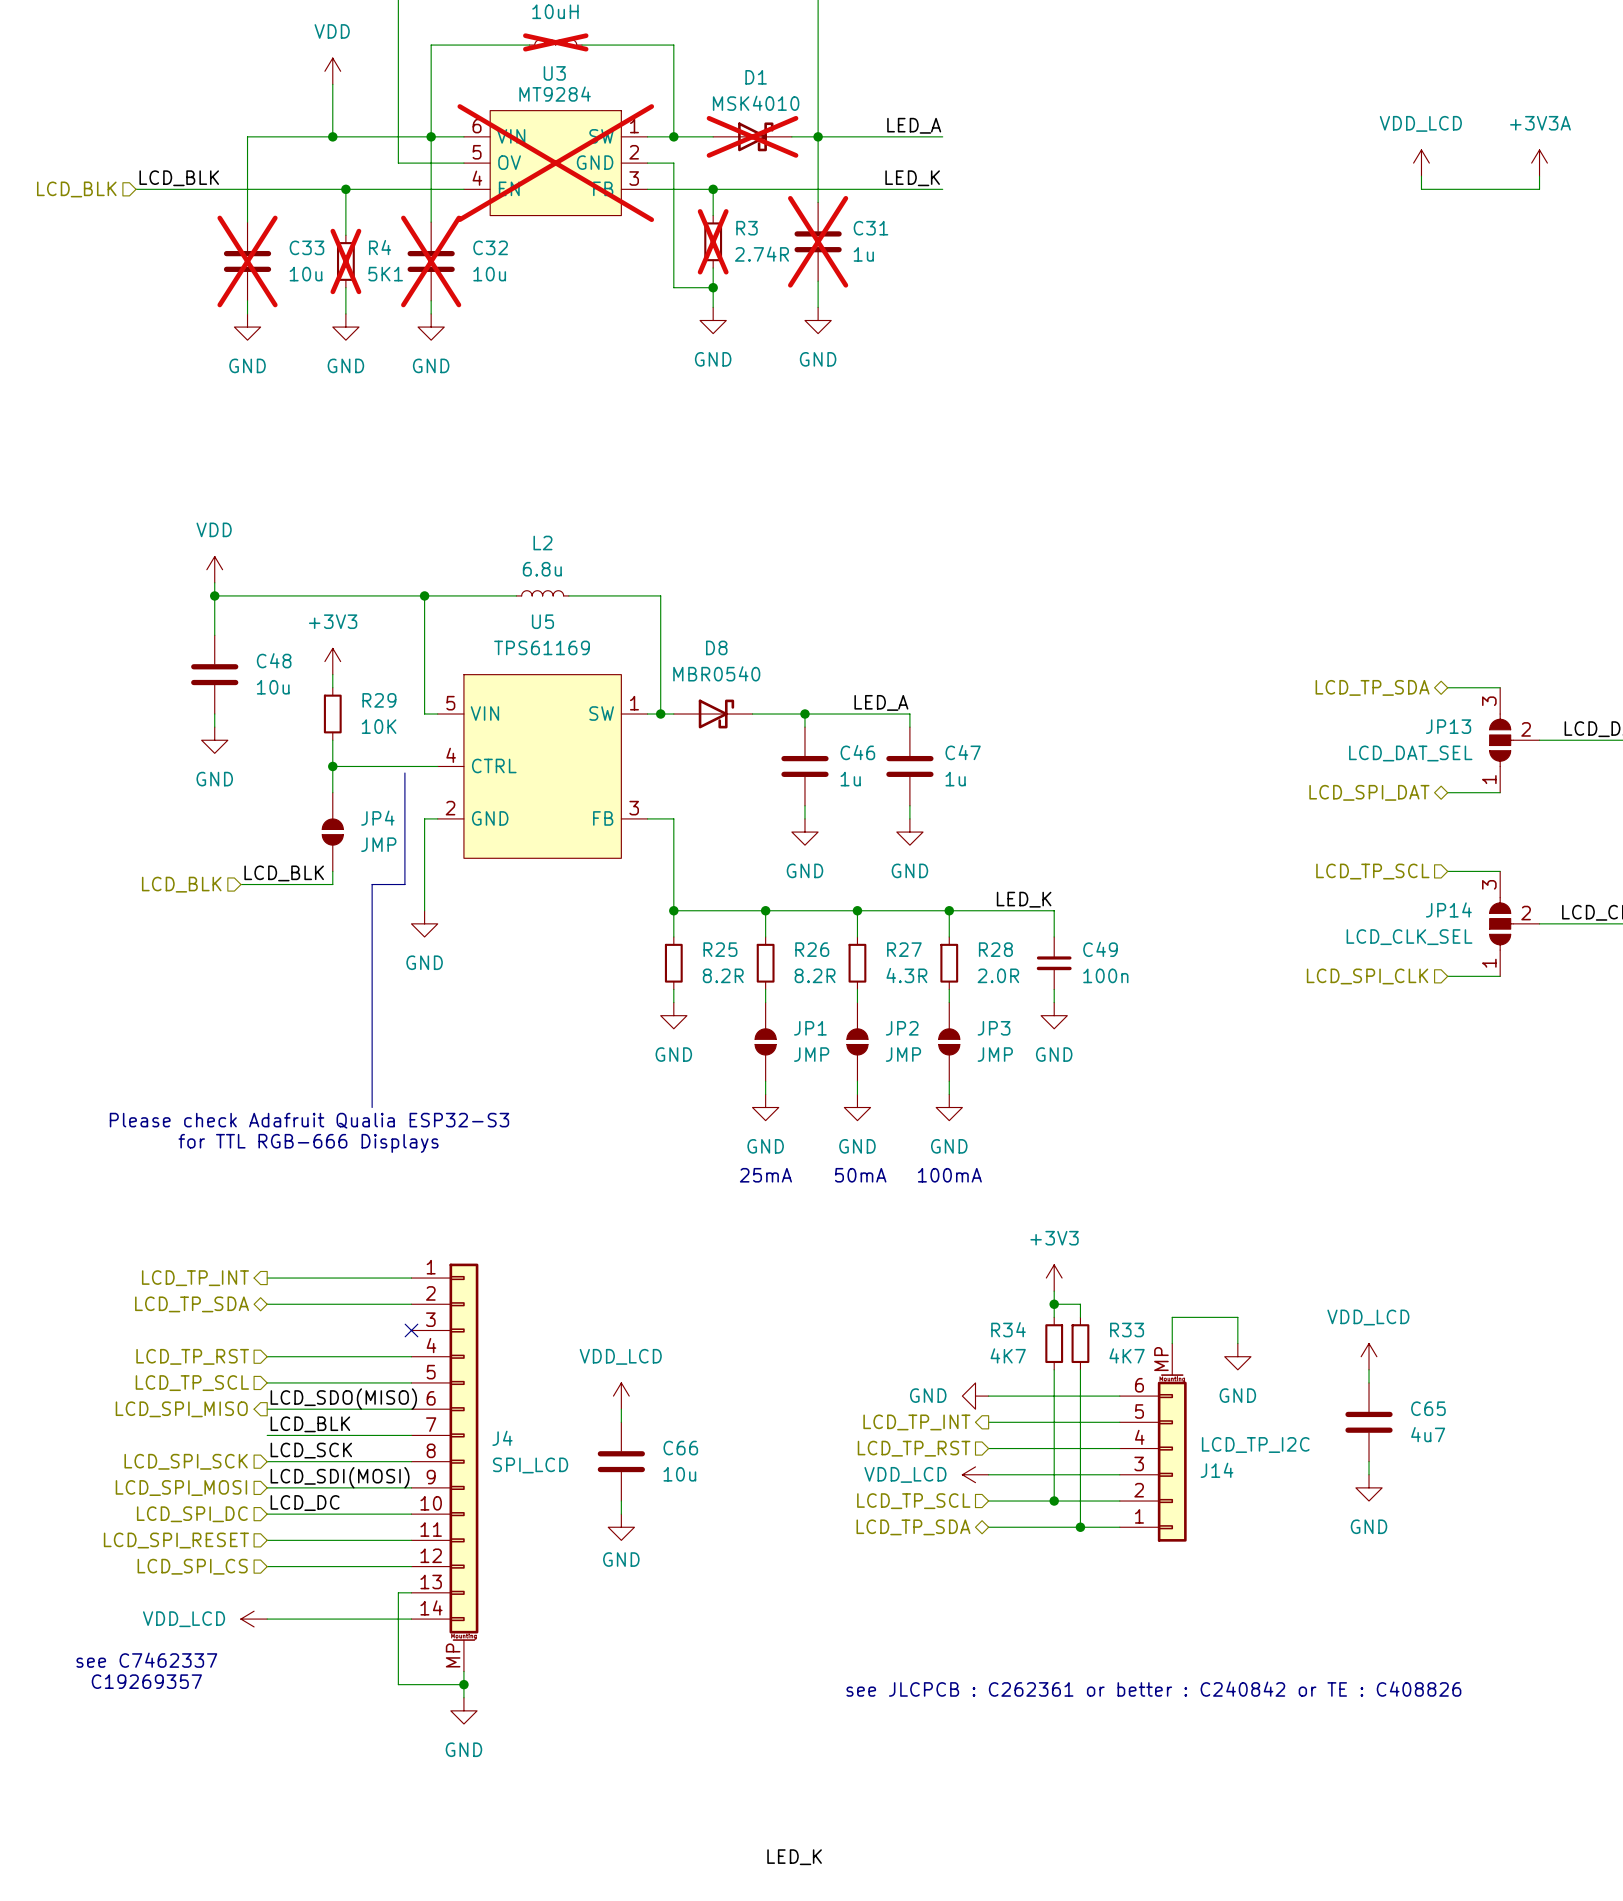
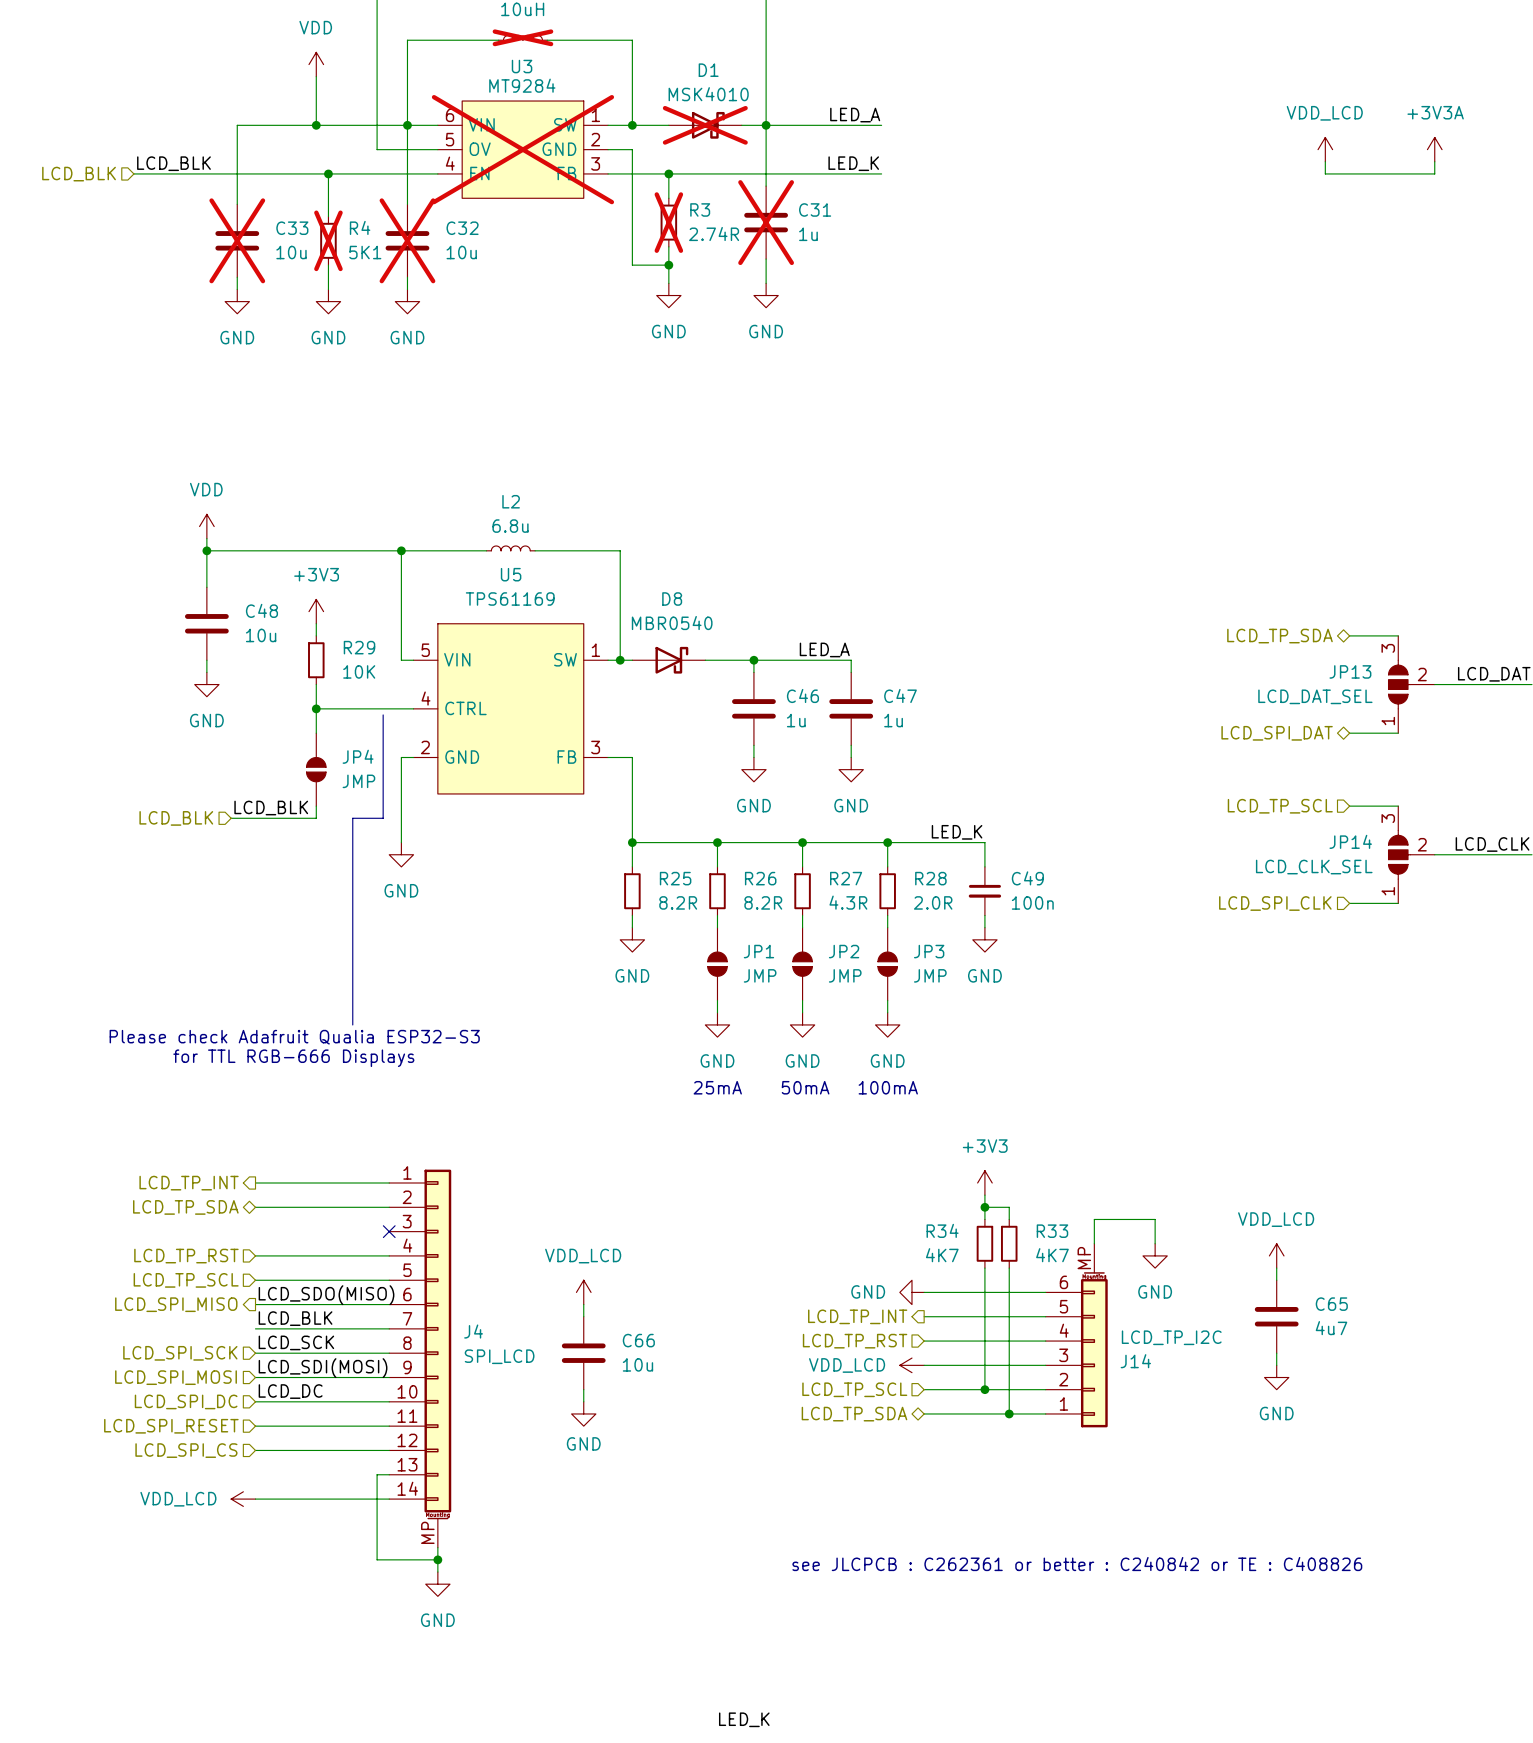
text: see C7462337 (146, 1660) -> none
text: C19269357 (146, 1681) -> none

